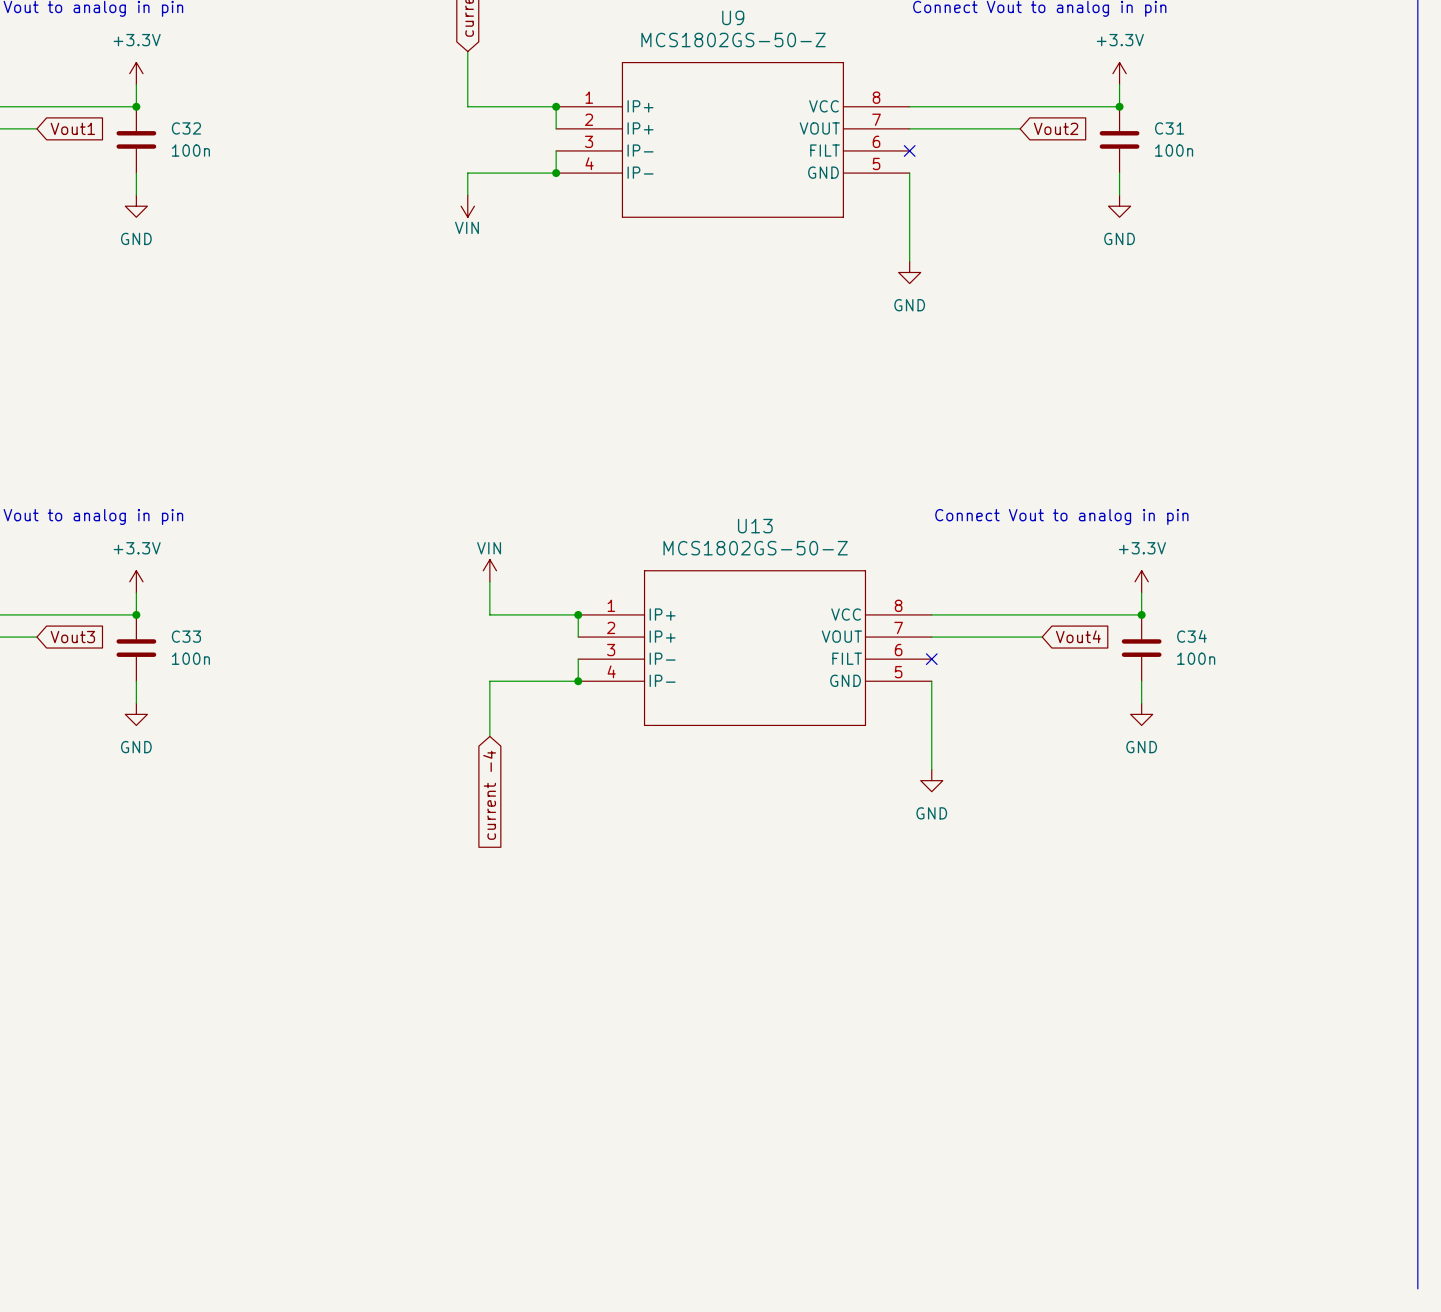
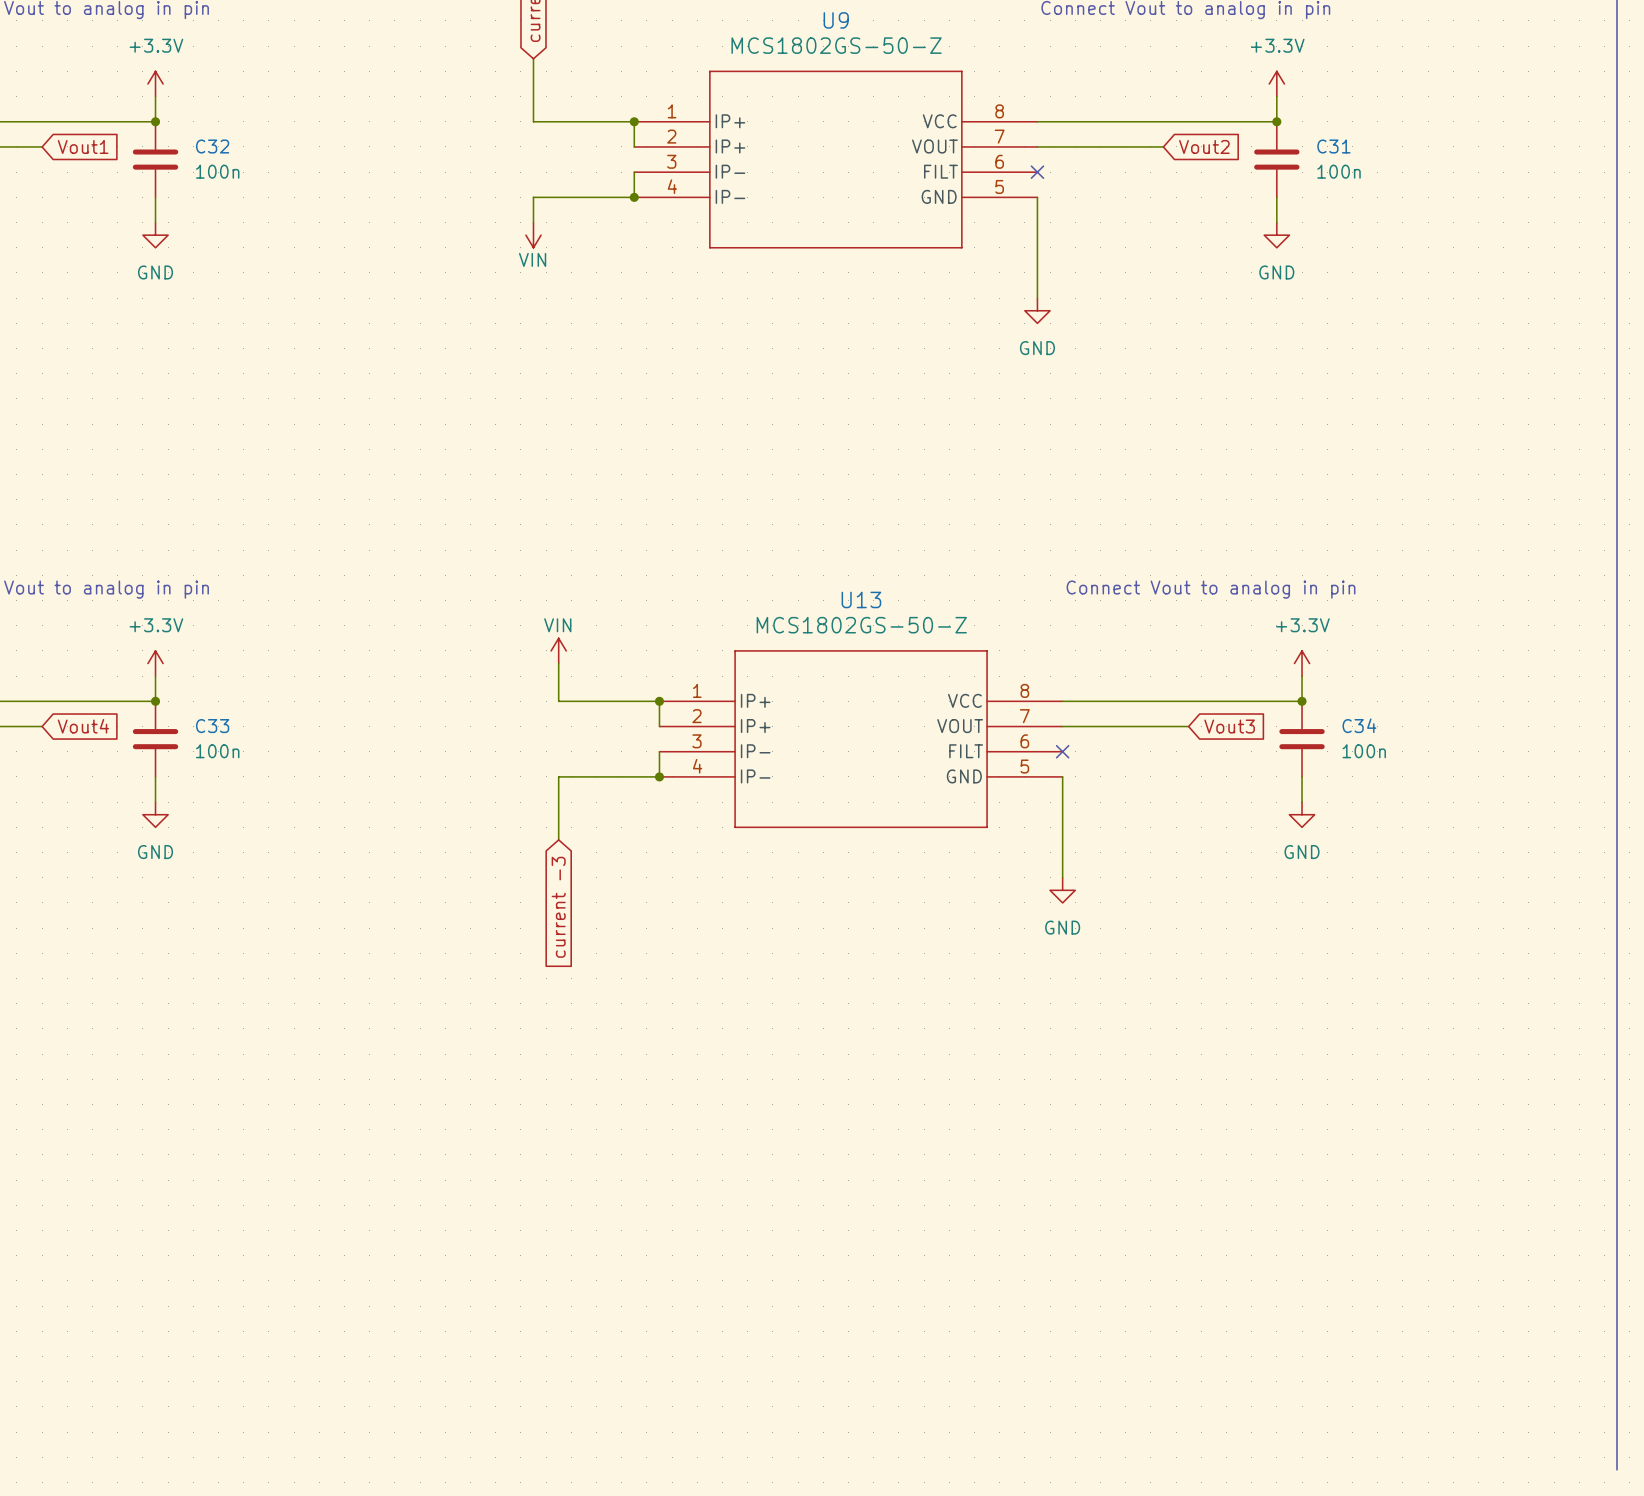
global label: Vout4 (1078, 636) -> Vout3 (1229, 726)
global label: Vout3 (72, 637) -> Vout4 (83, 726)
global label: current -4 (489, 795) -> current -3 (558, 907)

